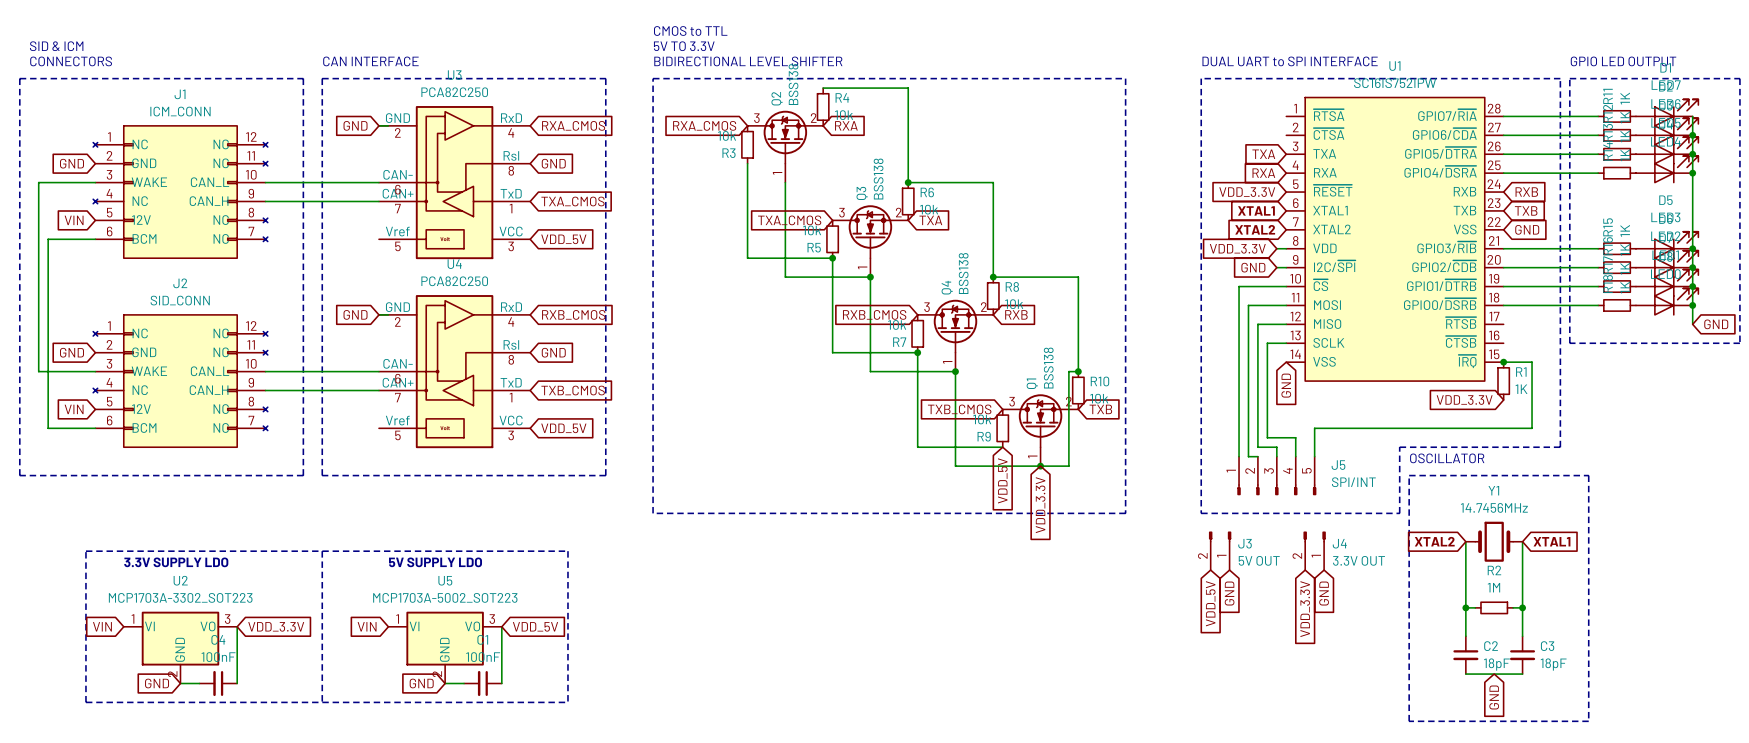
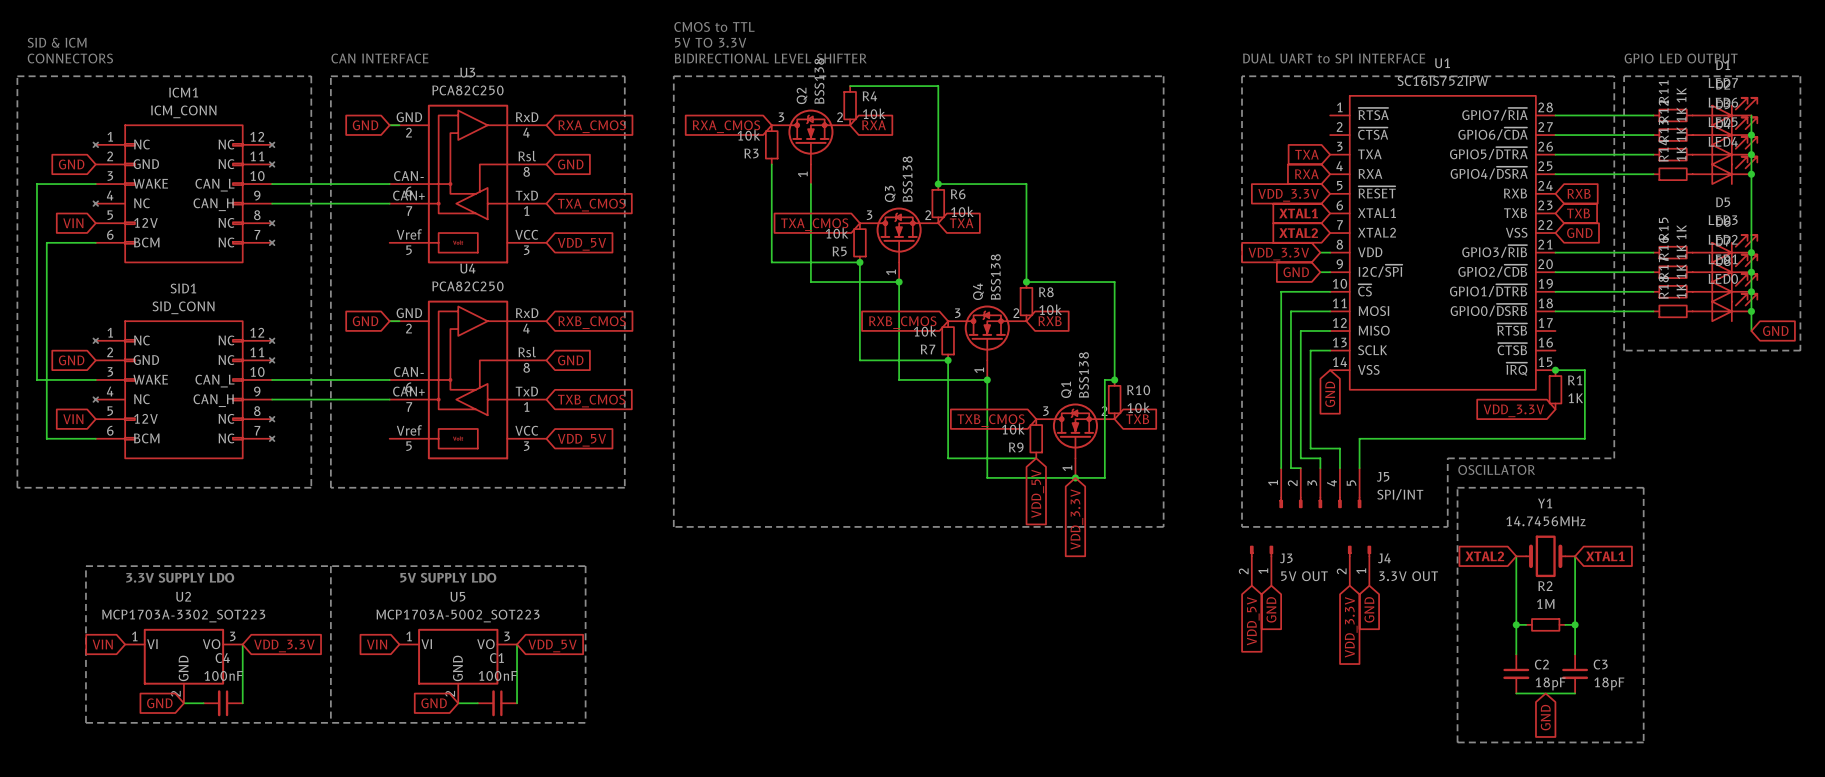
J1 name: J1 (180, 94) -> ICM1 (183, 92)
J2 name: J2 (180, 283) -> SID1 (183, 288)

